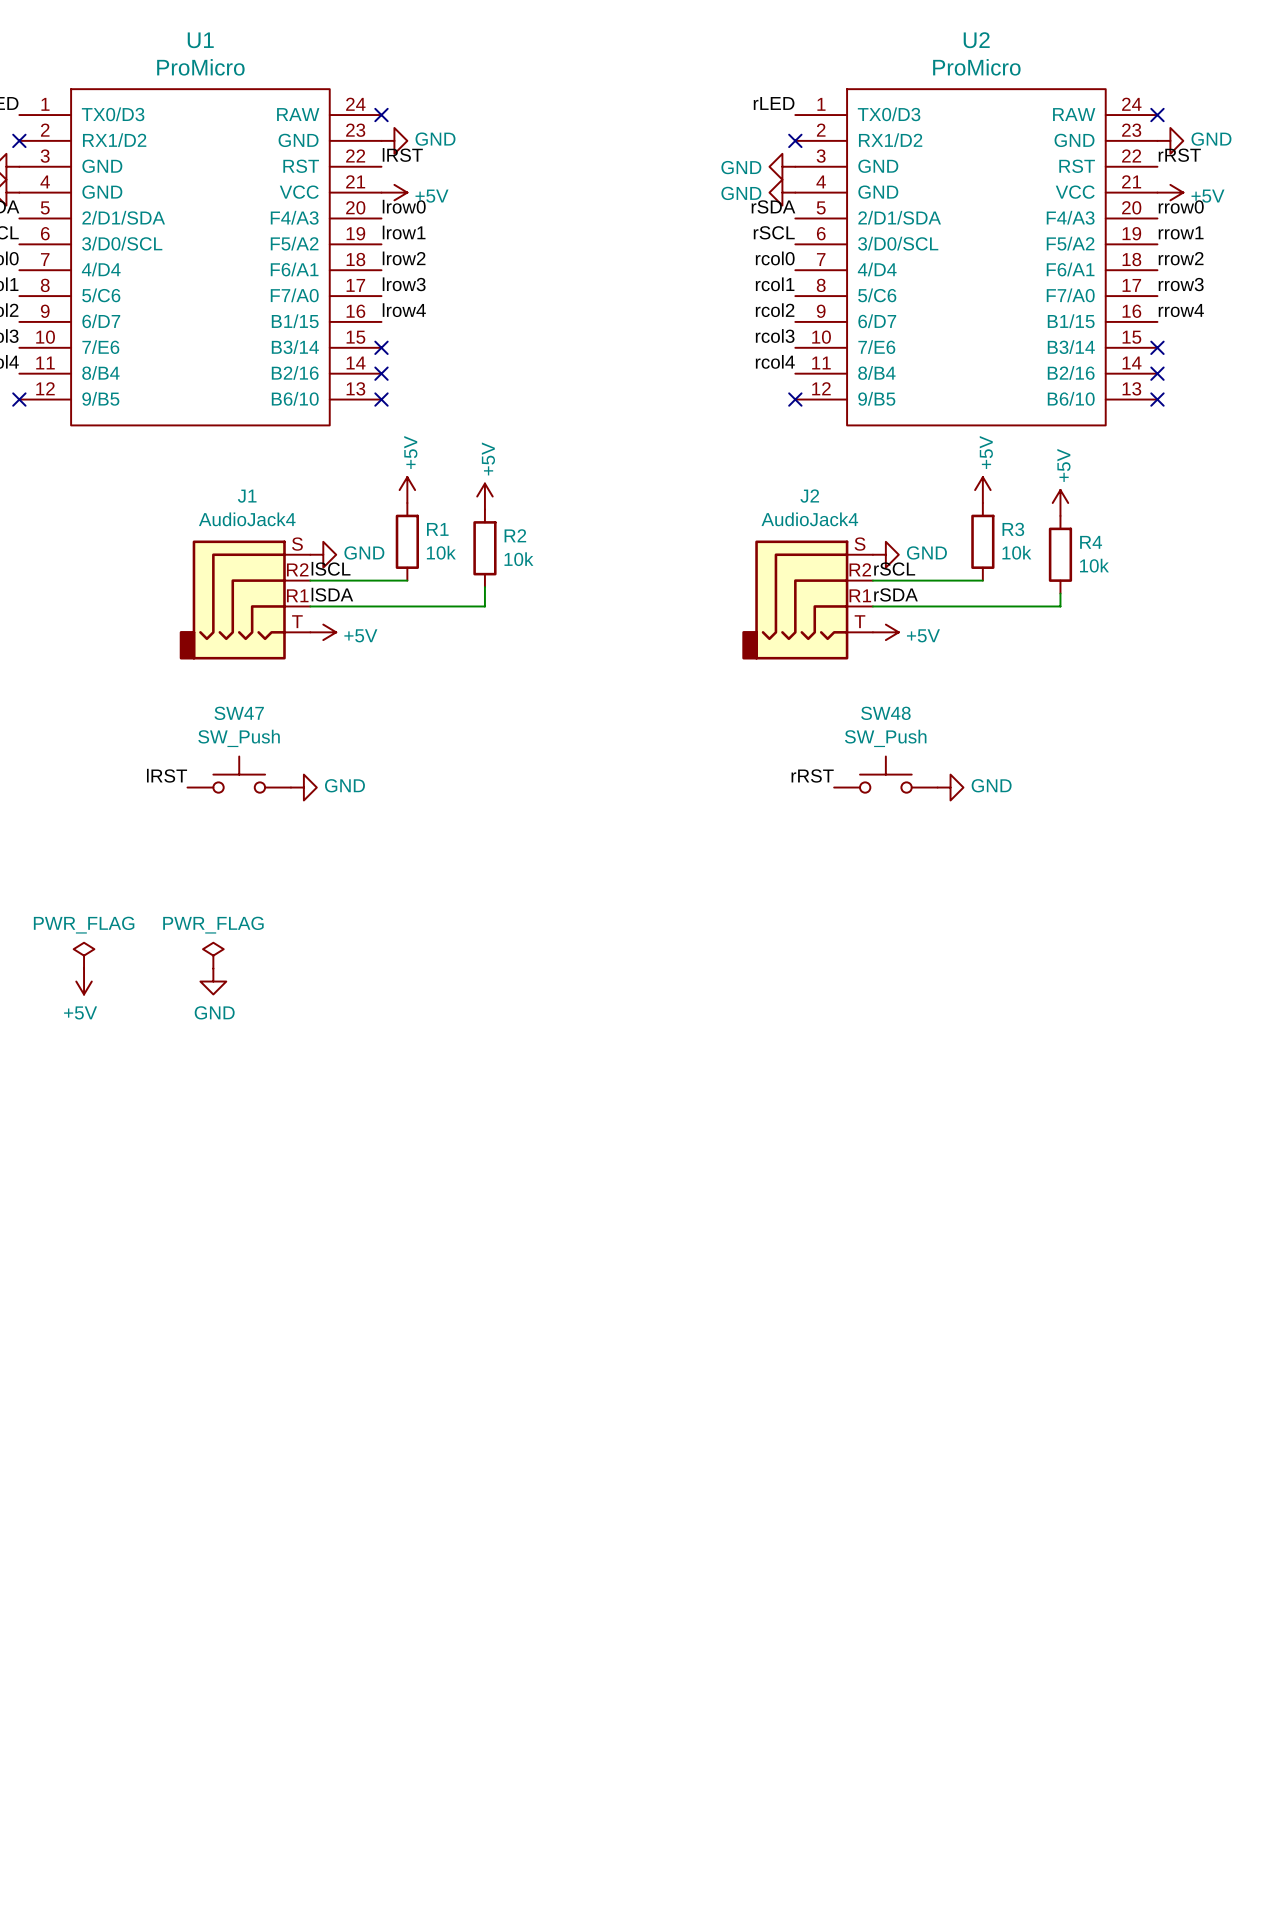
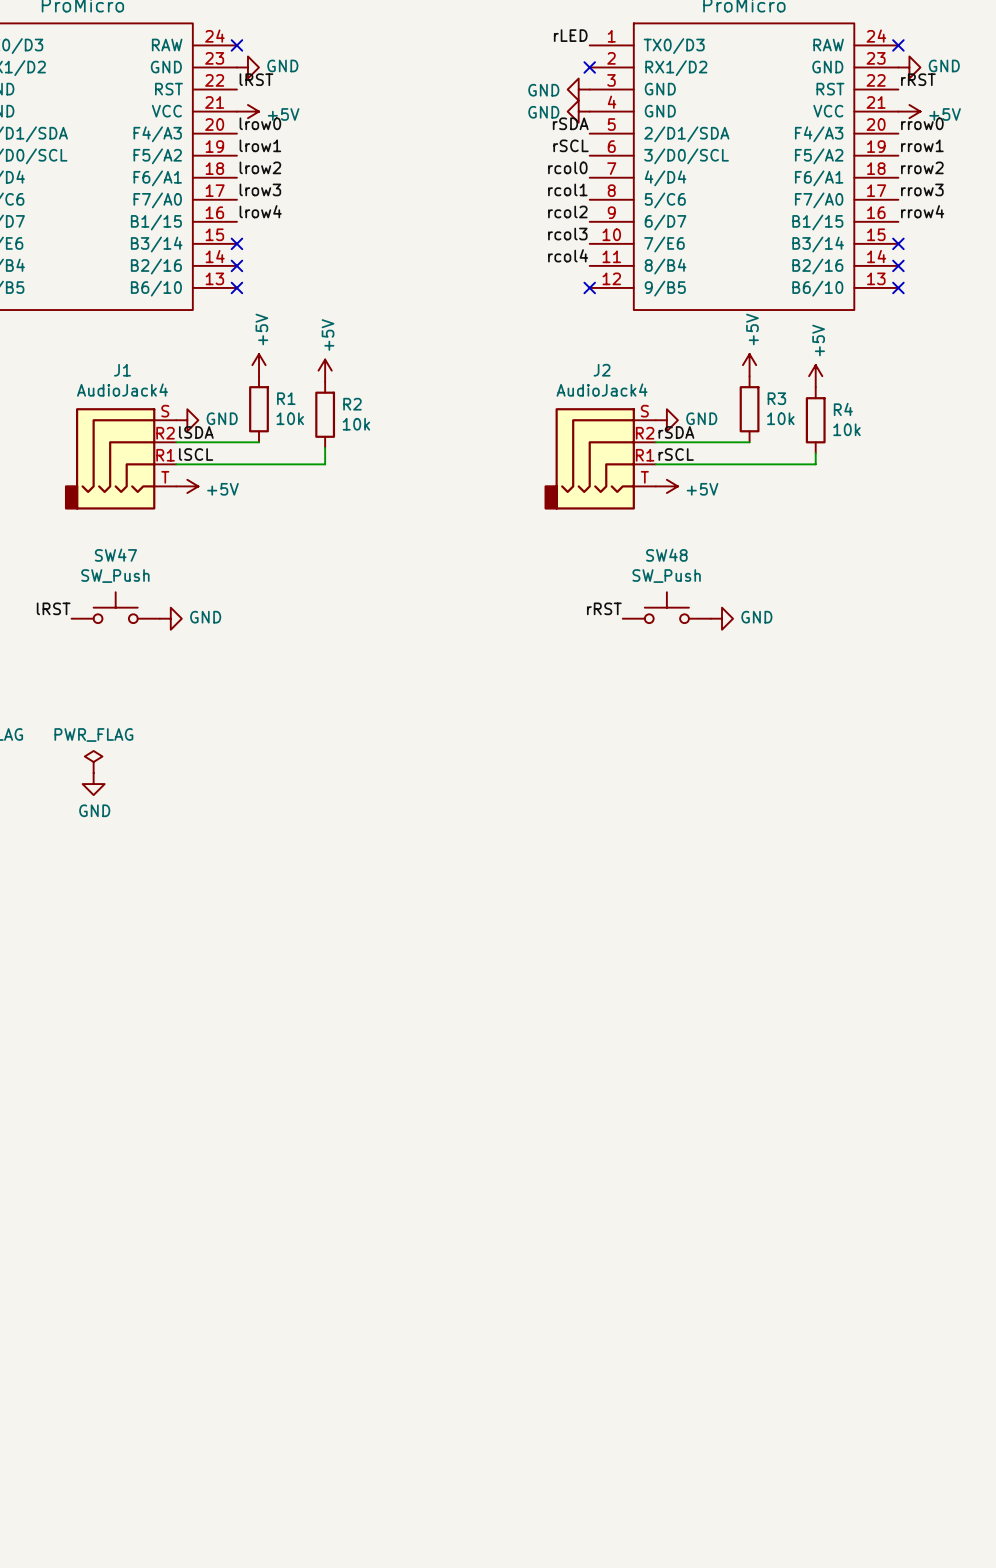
label: lSCL (331, 568) -> lSDA (196, 432)
label: rSCL (894, 569) -> rSDA (676, 432)
label: lSDA (332, 594) -> lSCL (196, 454)
label: rSDA (896, 594) -> rSCL (676, 454)

